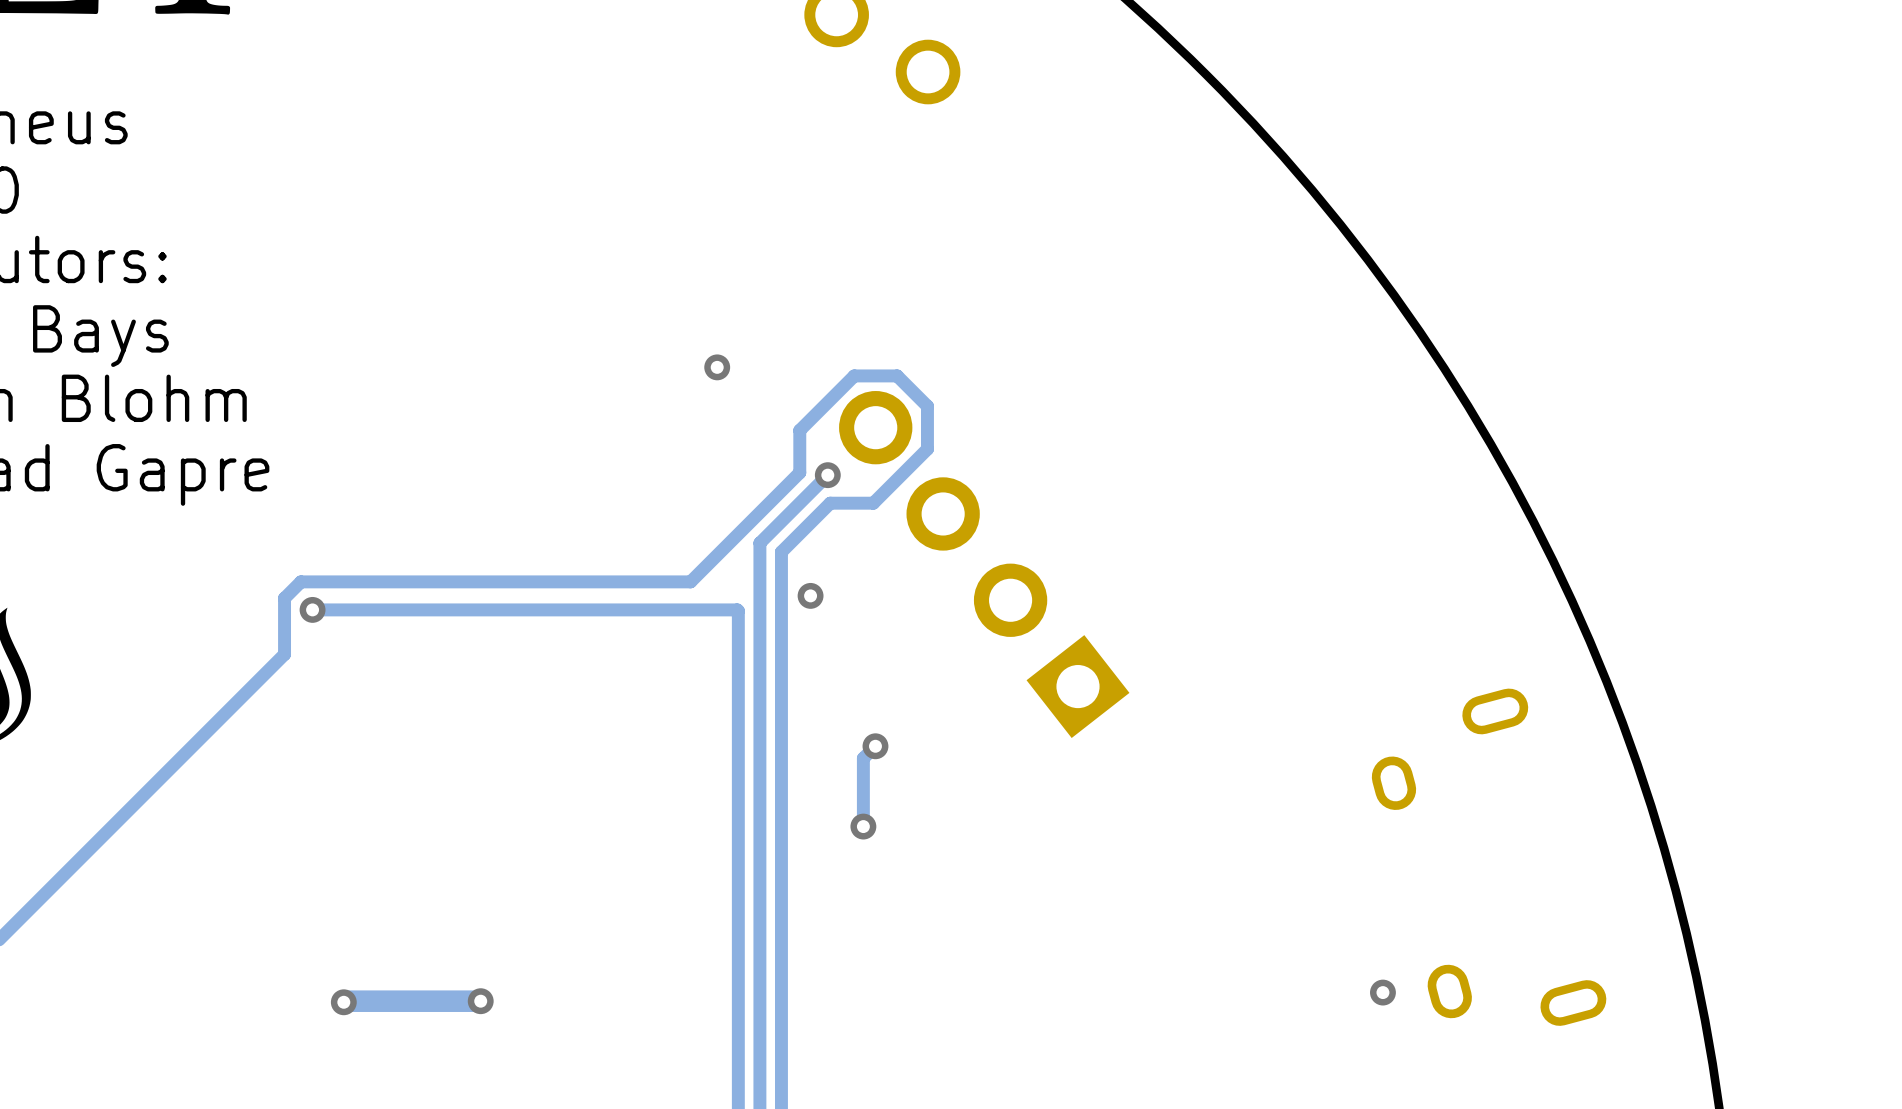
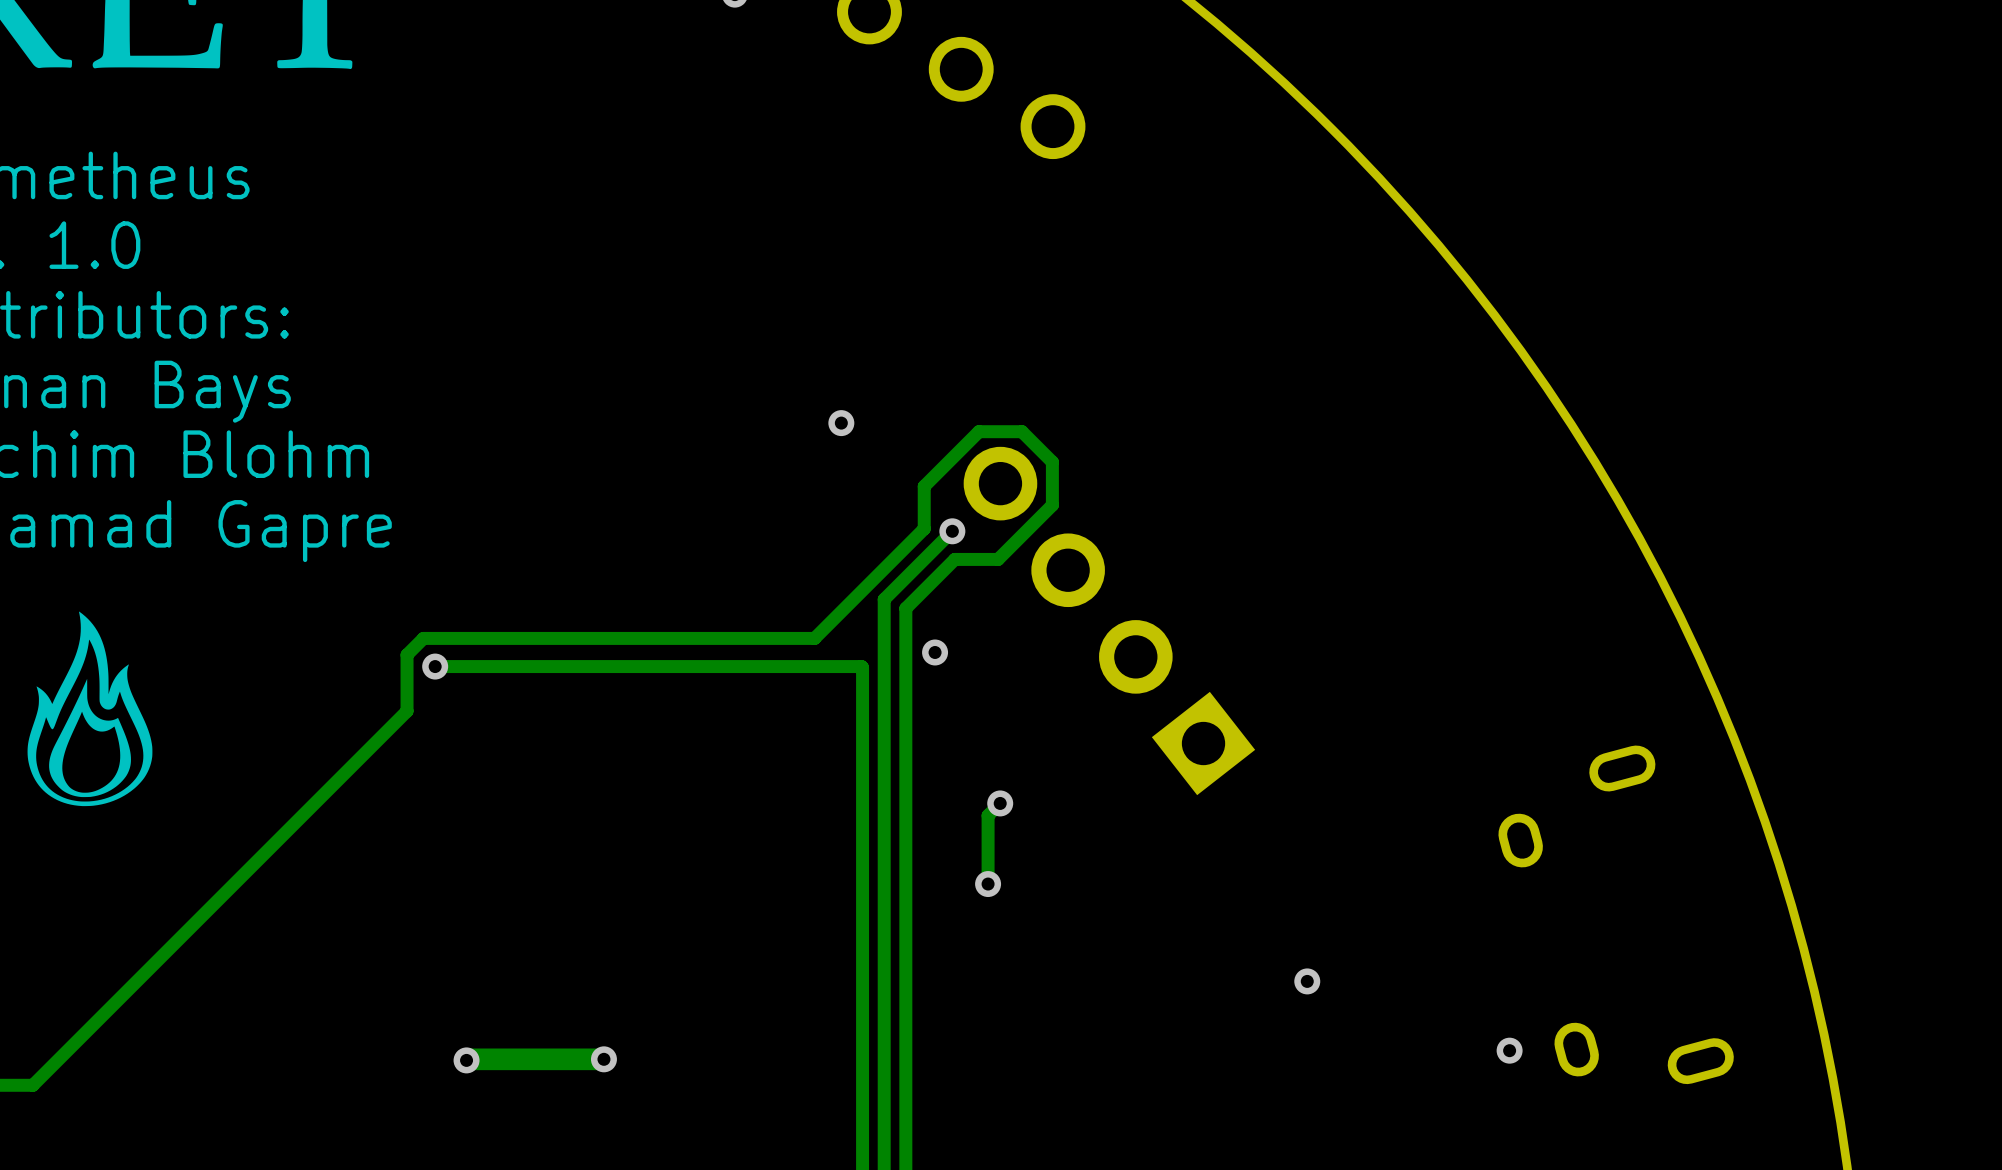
via: none -> (1307, 981)

